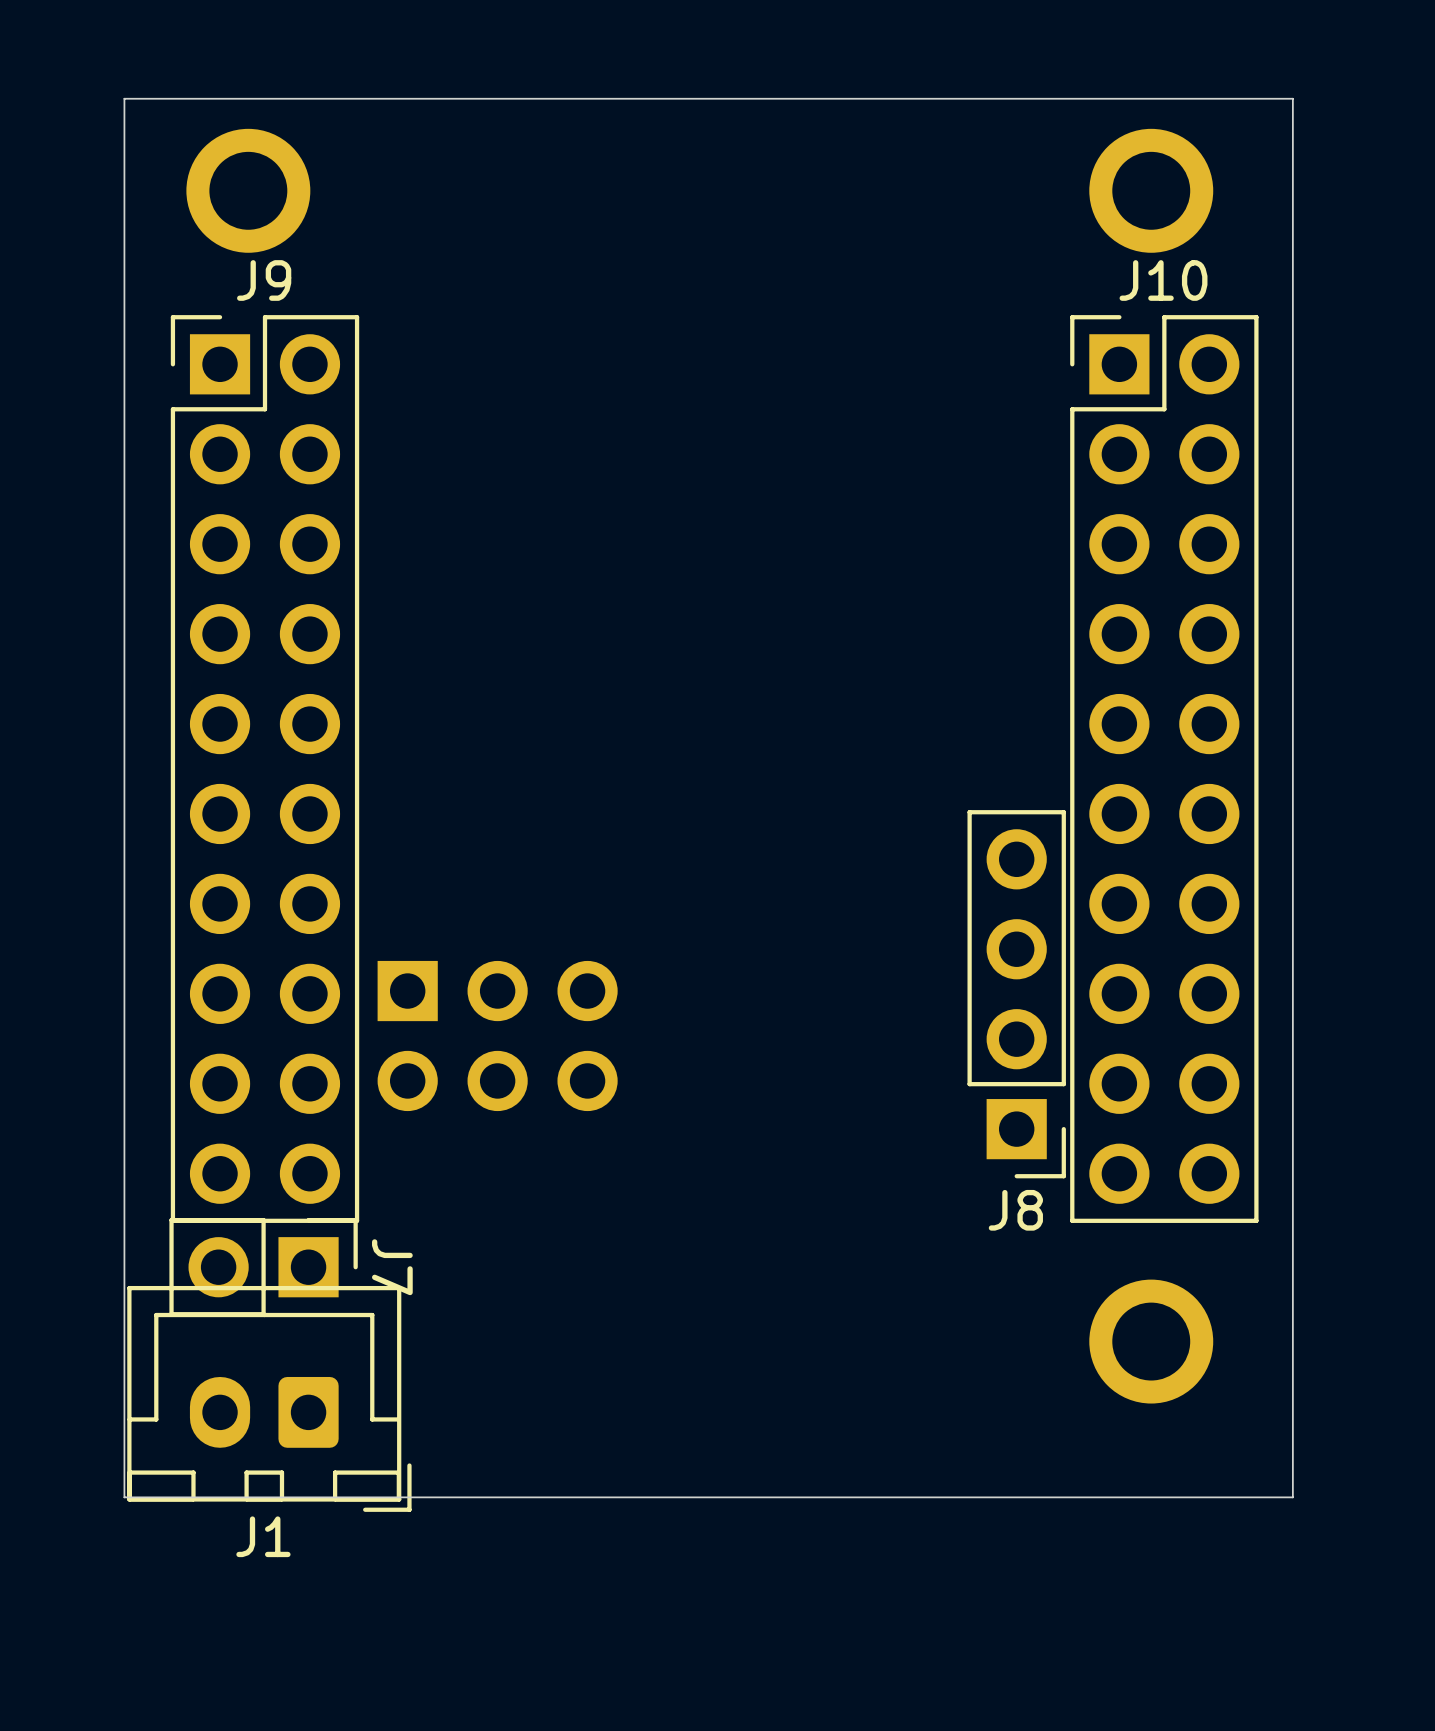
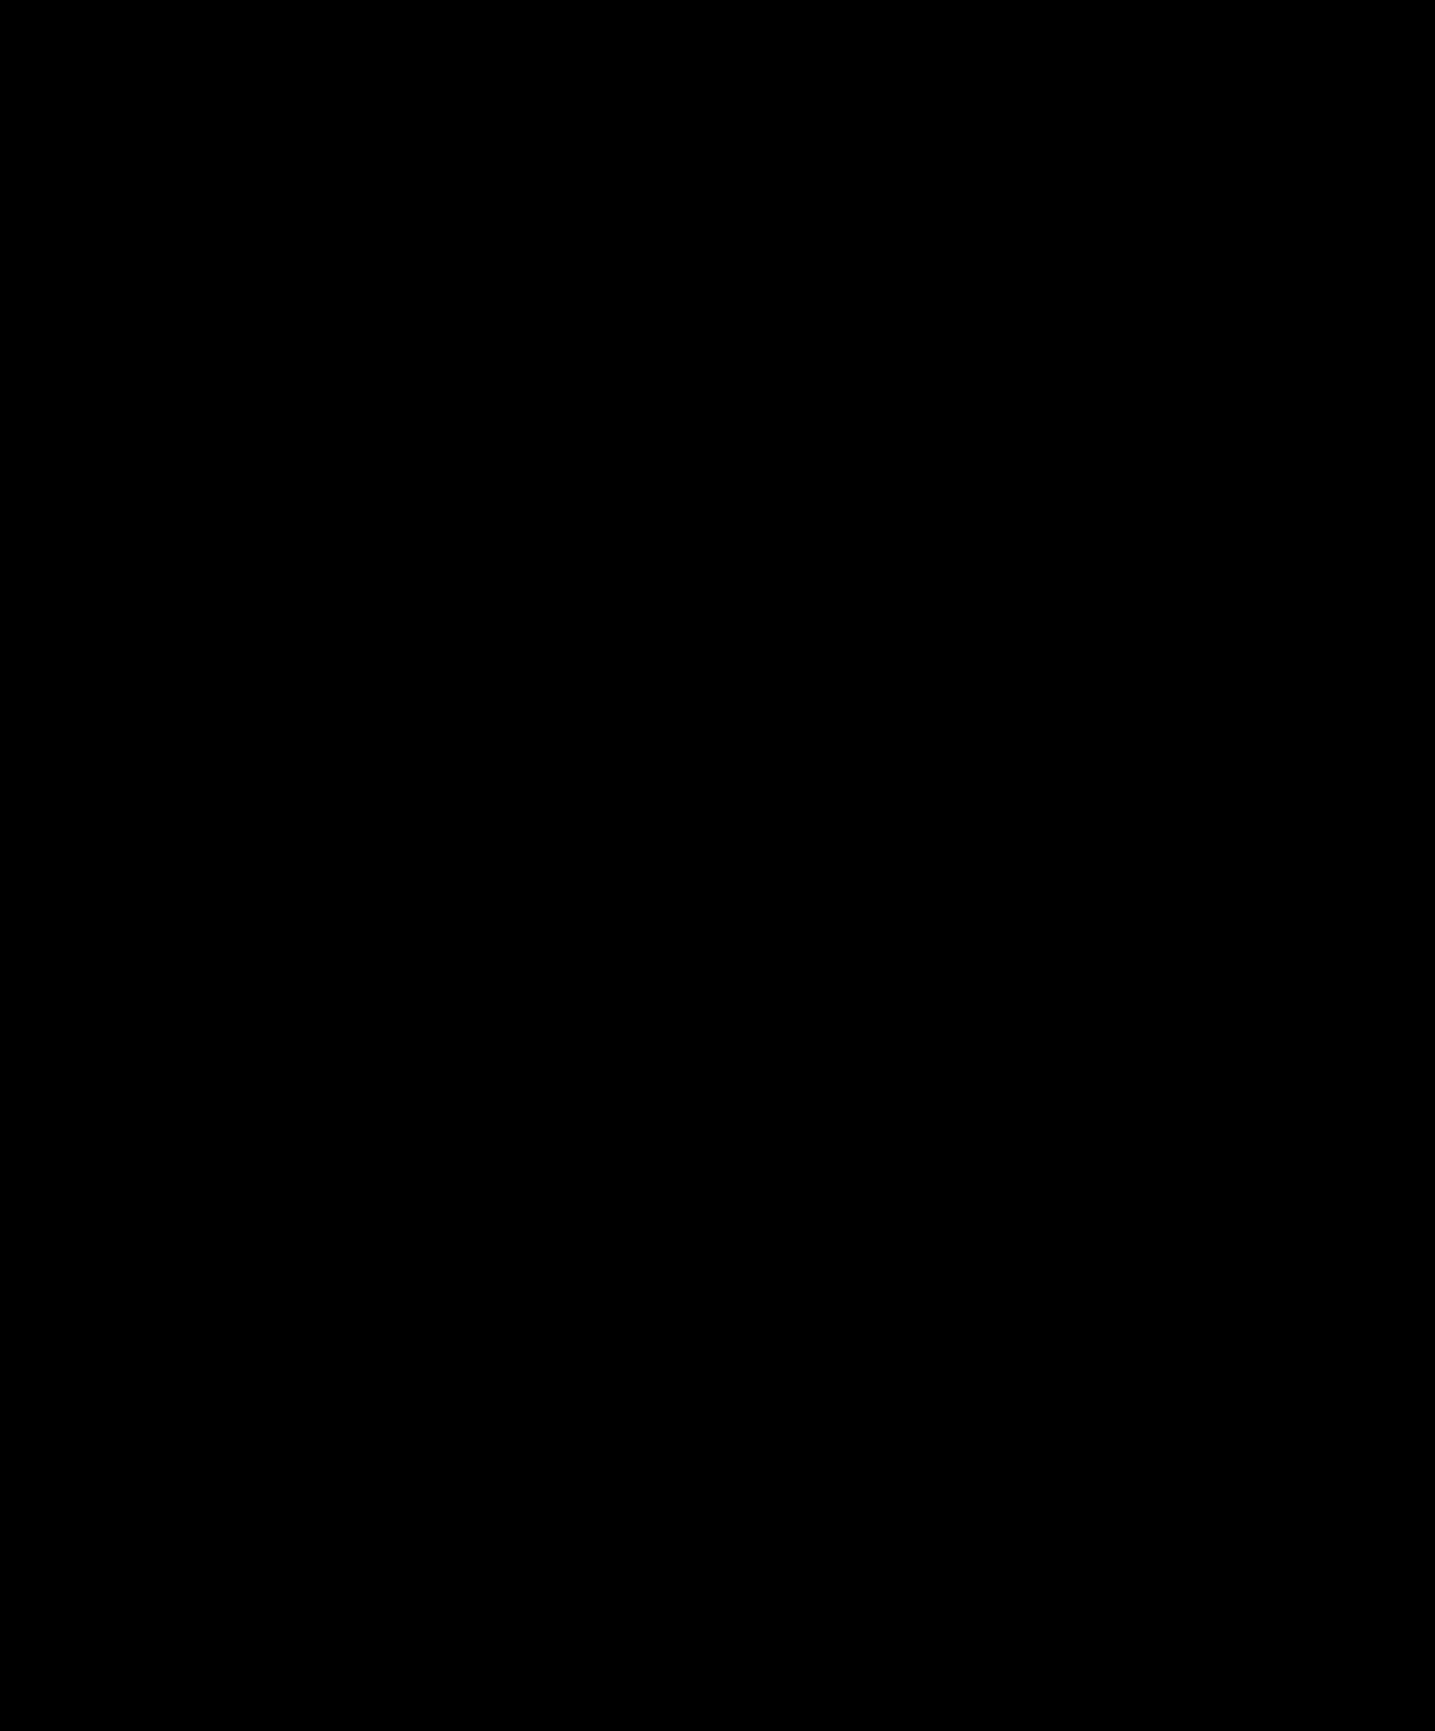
board edge: (1292, 98) (1292, 1497) (124, 1497) (124, 98) (1292, 98) -> none
part: (248, 190) -> none
part: (1151, 190) -> none
J9: (265, 769) -> none
J10: (1164, 769) -> none
J8: (1016, 994) -> none
part: (497, 1036) -> none
J7: (263, 1267) -> none
part: (1151, 1341) -> none
J1: (269, 1398) -> none

